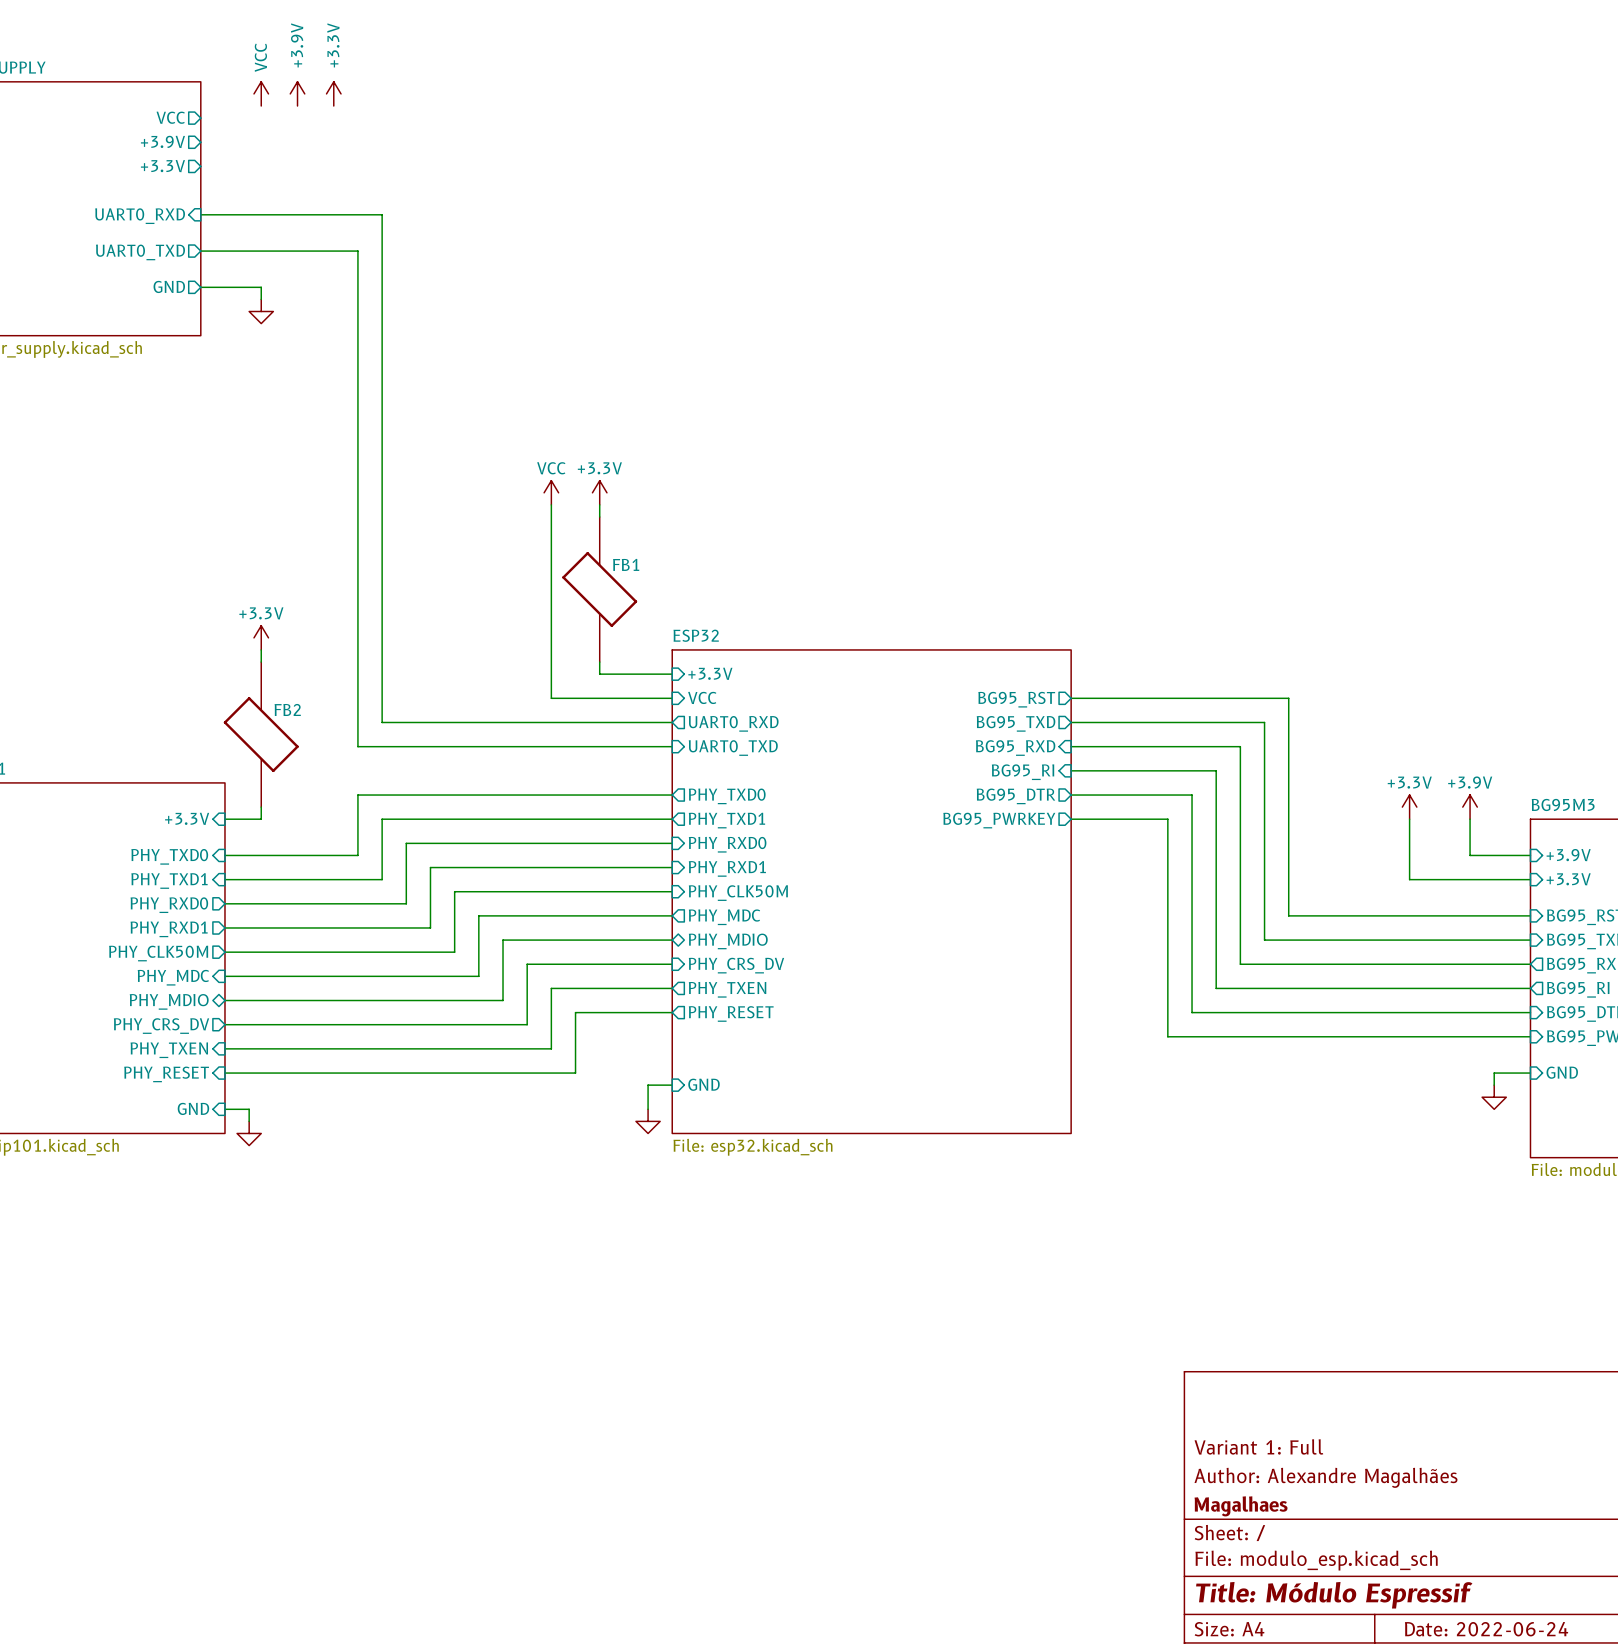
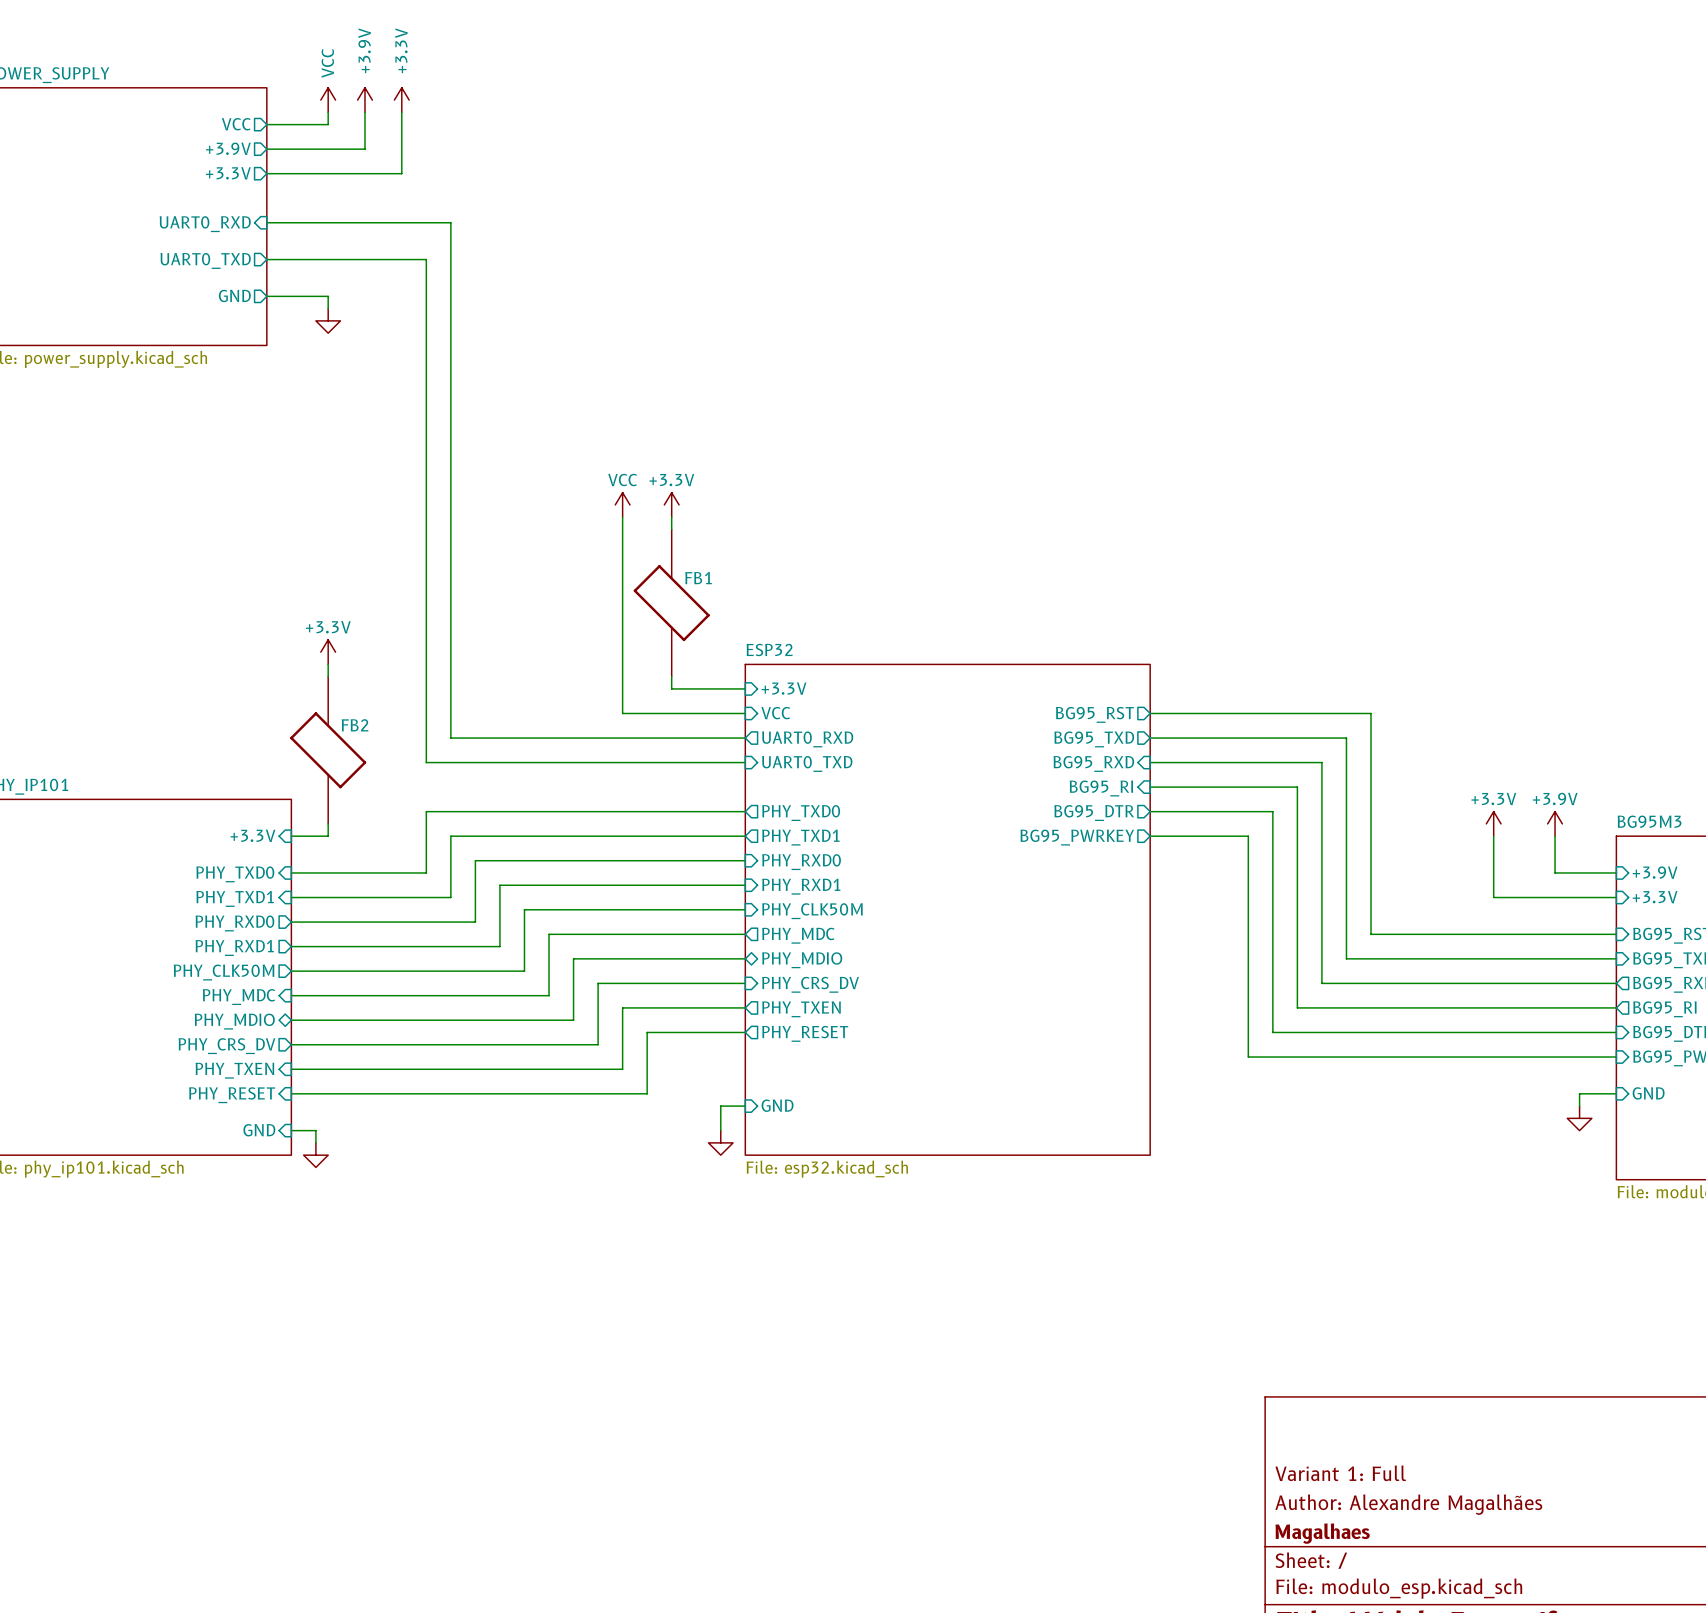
wire: none -> (328, 112) (328, 124) (266, 124)
wire: none -> (364, 112) (364, 149) (266, 149)
wire: none -> (401, 112) (401, 173) (266, 173)

